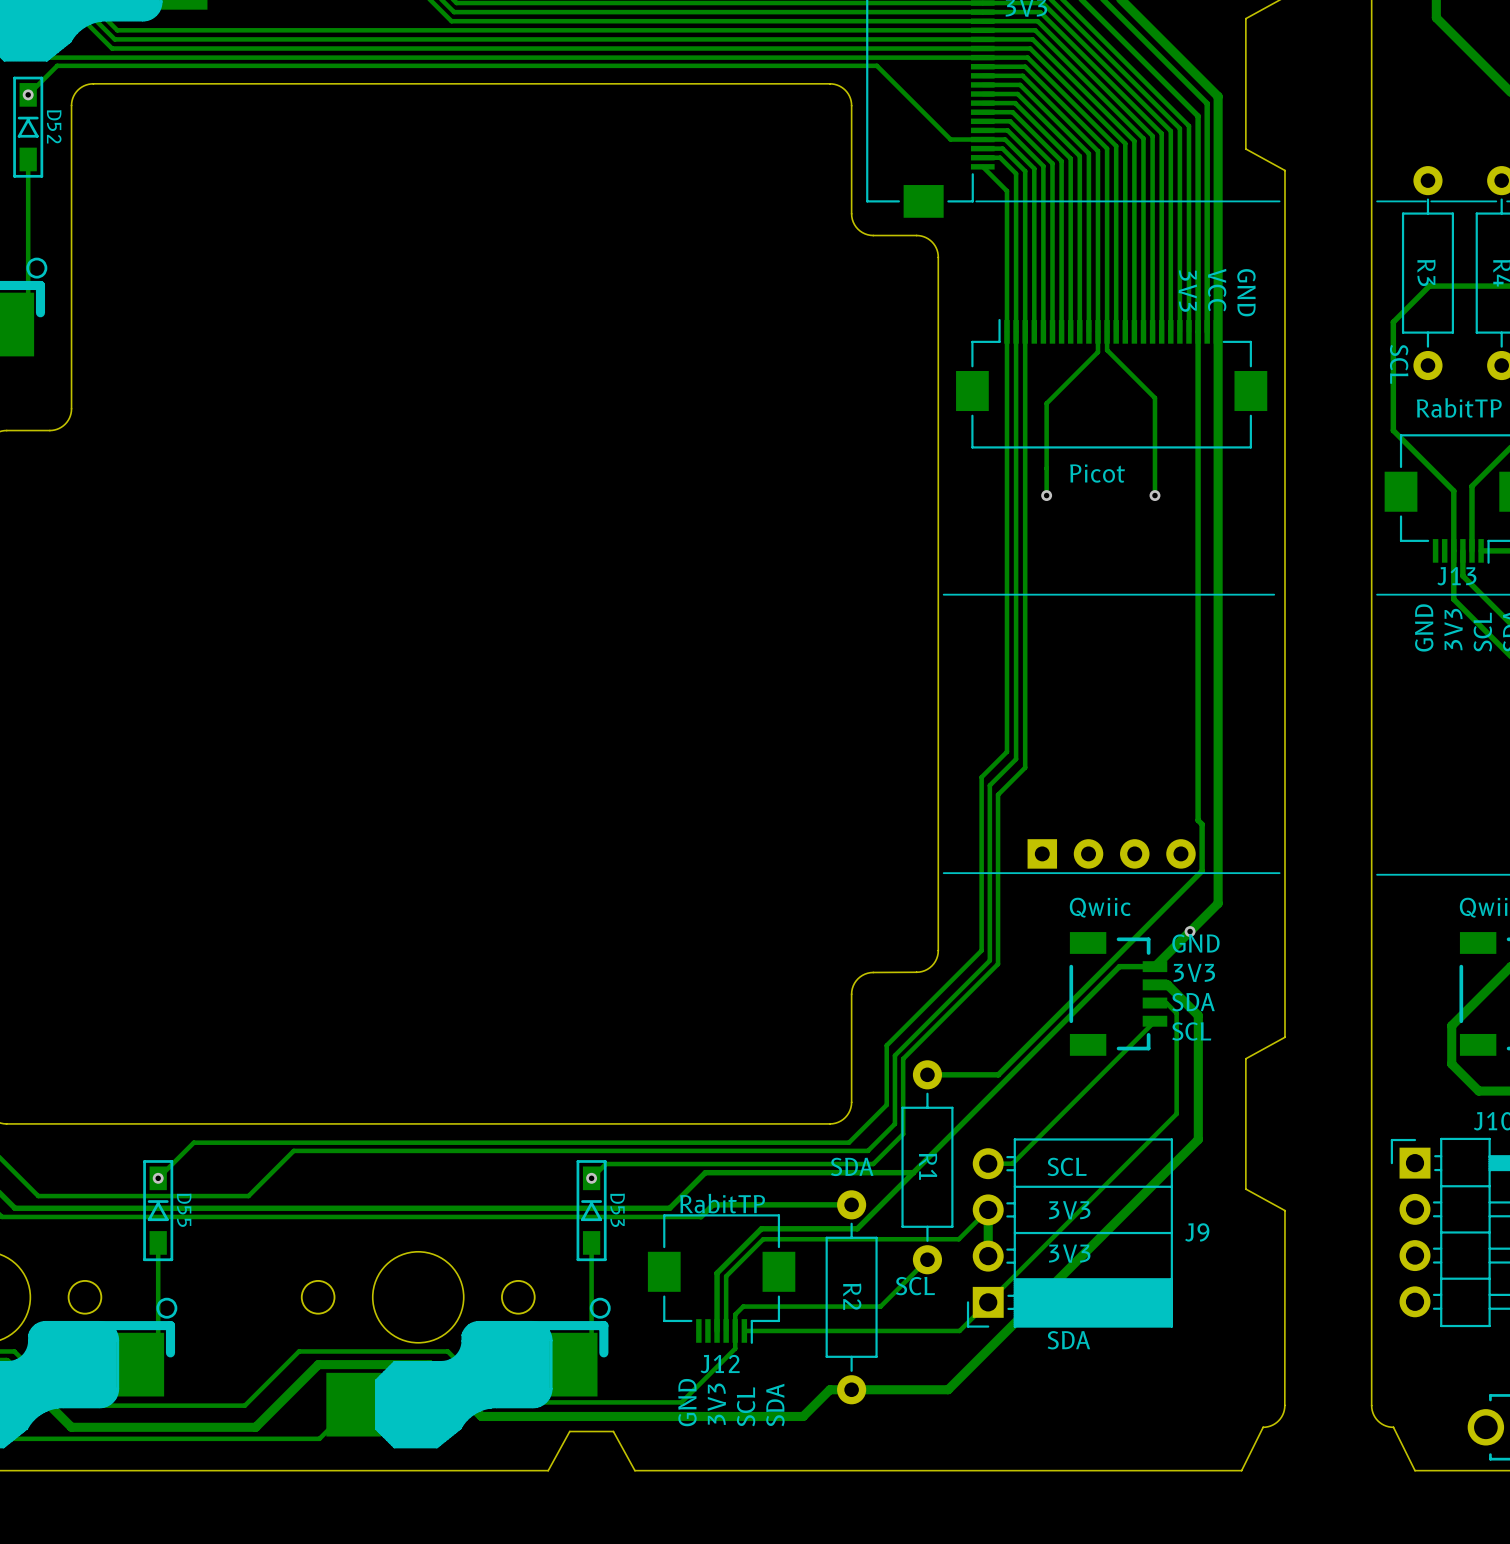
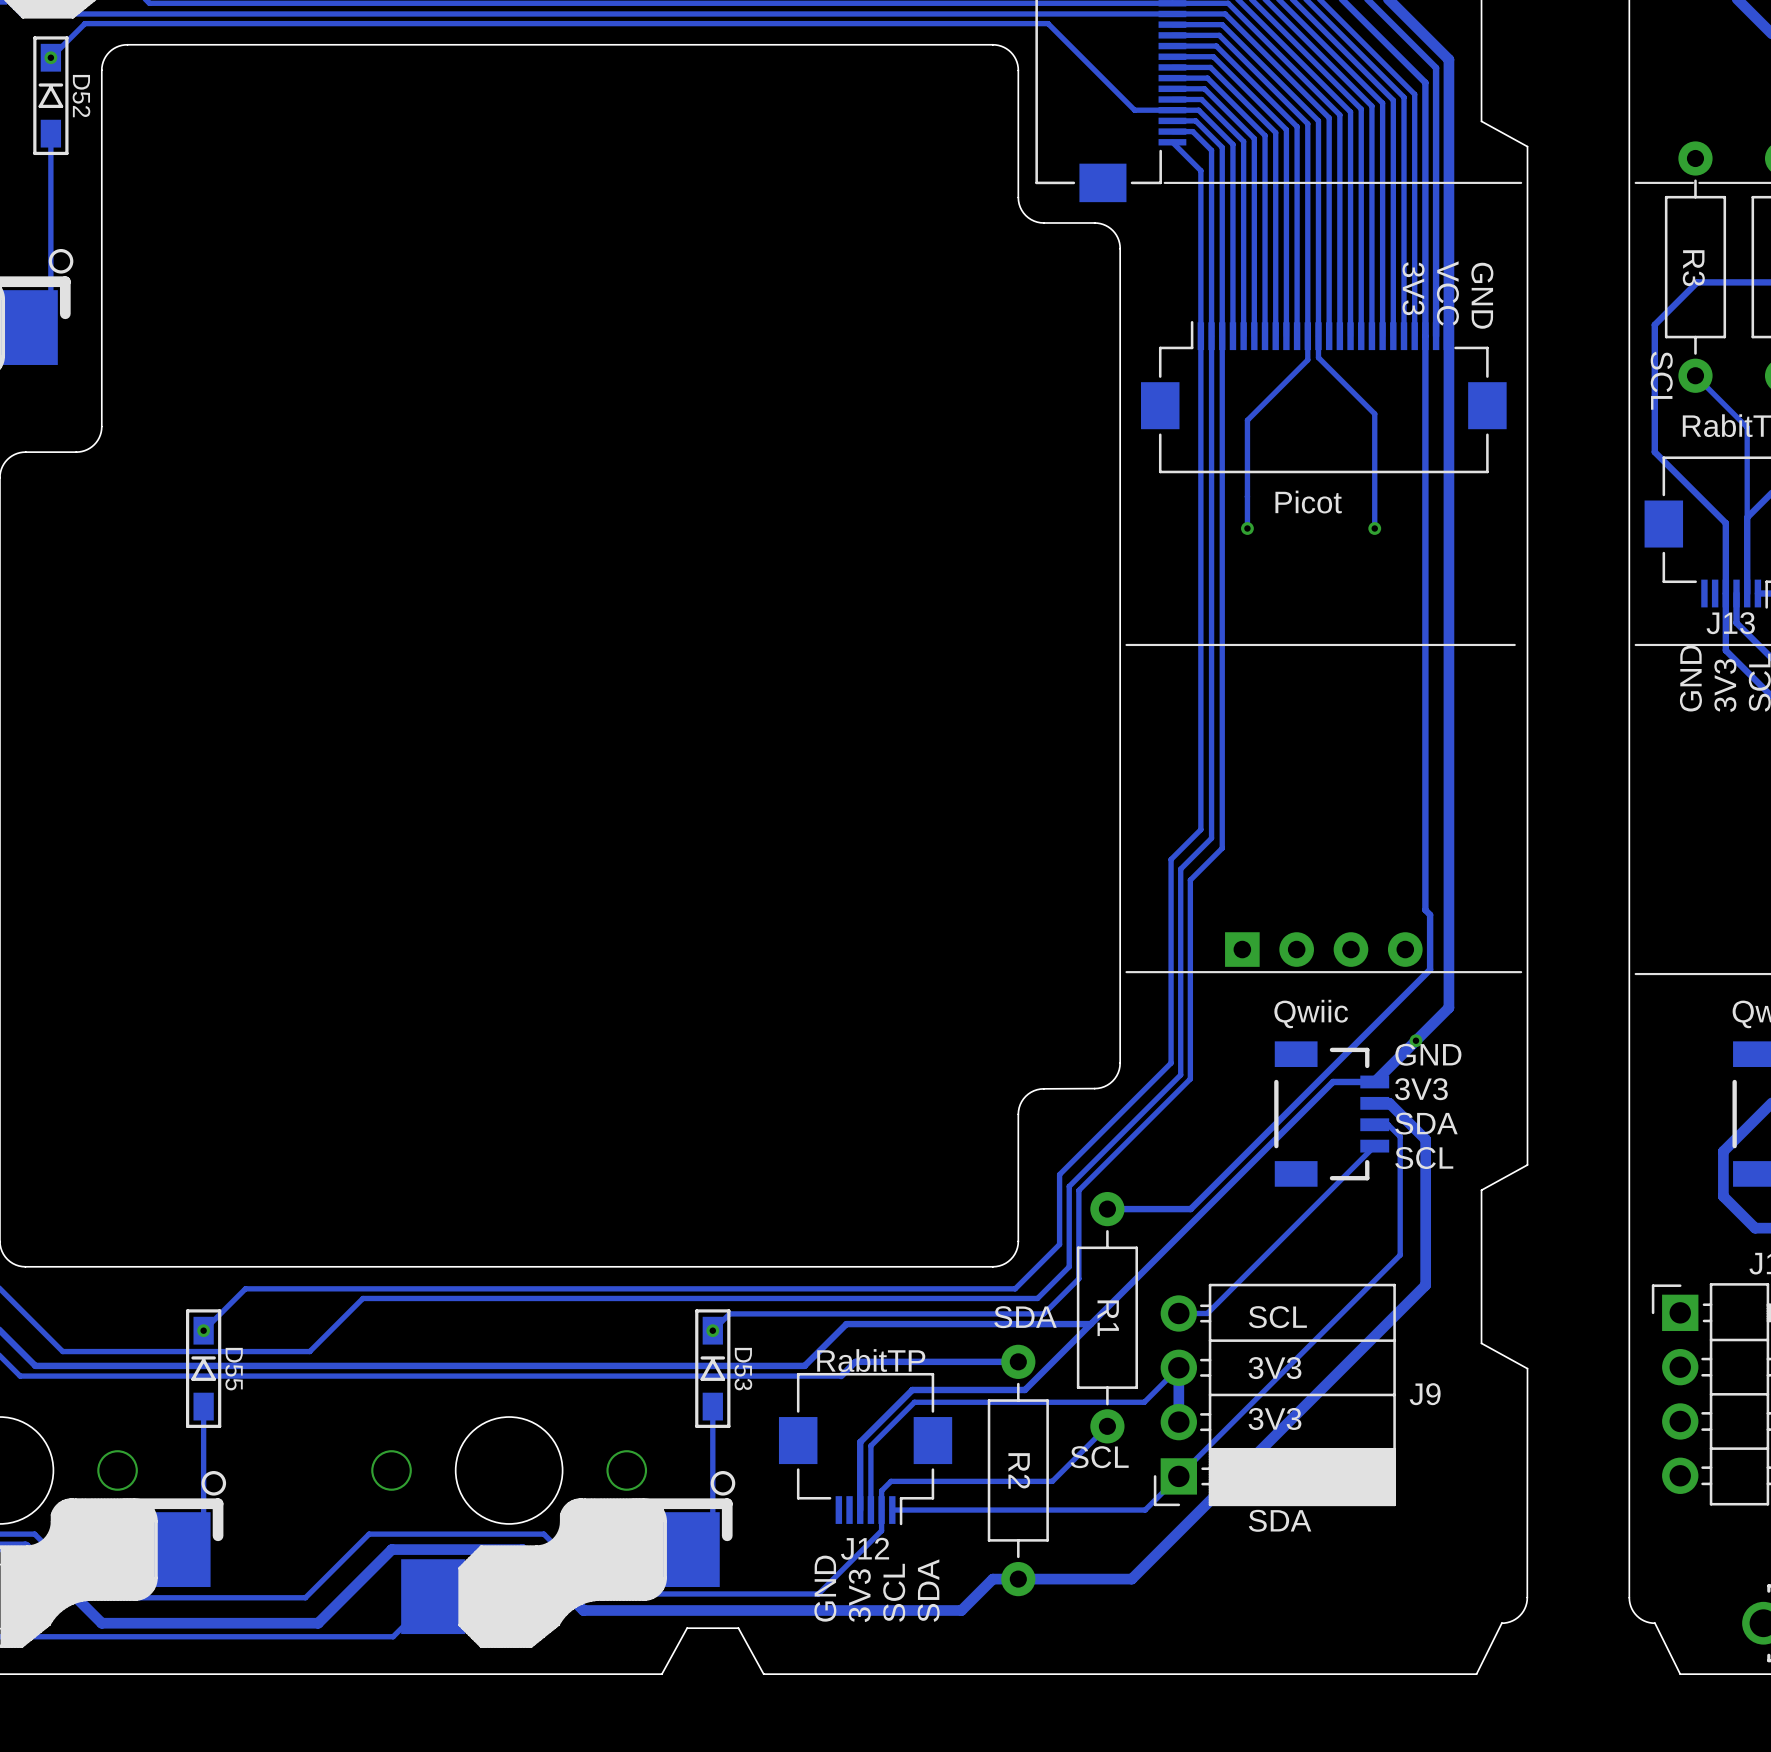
track: none -> (1695, 375) (1747, 427) (1747, 593)

